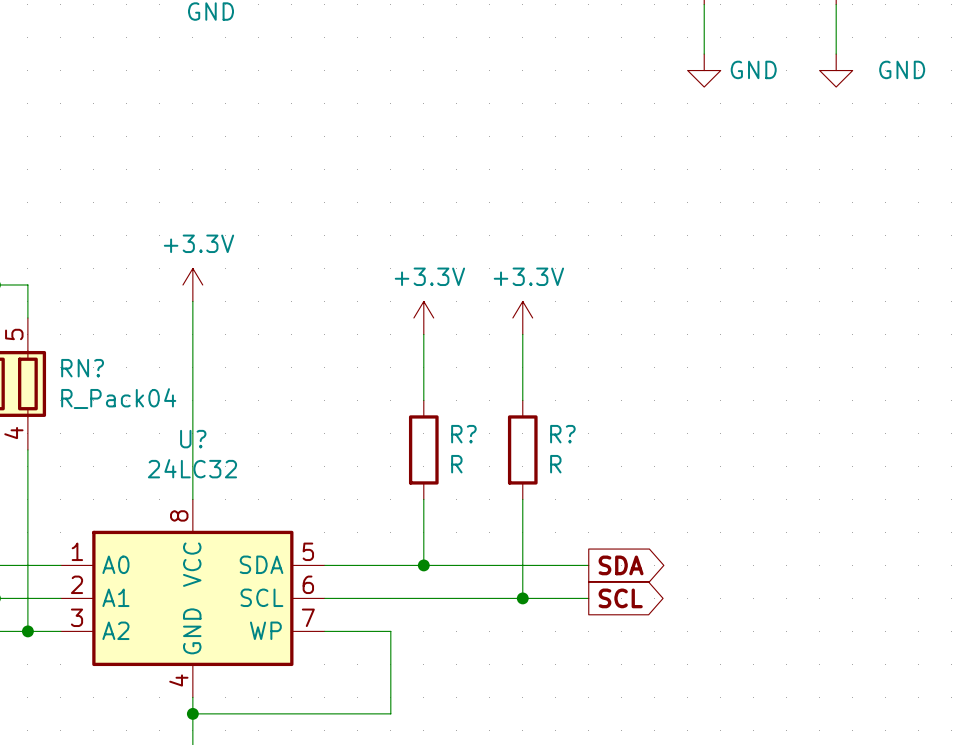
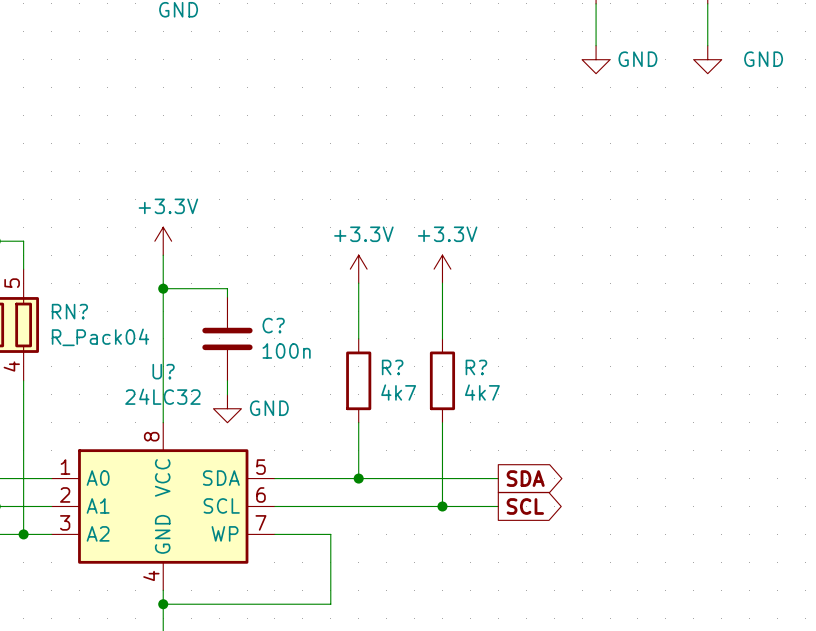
wire: none -> (163, 288) (227, 288) (227, 297)
junction: none -> (163, 288)
C?: none -> 100n (227, 338)
wire: none -> (227, 380) (227, 394)
R? value: R (456, 464) -> 4k7 (398, 392)
R? value: R (555, 464) -> 4k7 (482, 392)
power symbol: none -> GND (227, 408)

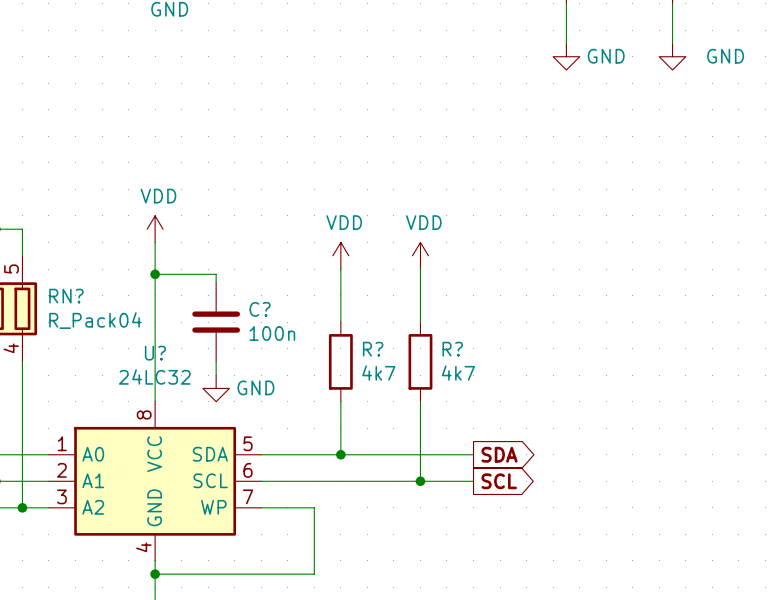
power symbol: +3.3V (163, 241) -> VDD (155, 229)
power symbol: +3.3V (358, 269) -> VDD (340, 255)
power symbol: +3.3V (442, 269) -> VDD (420, 255)

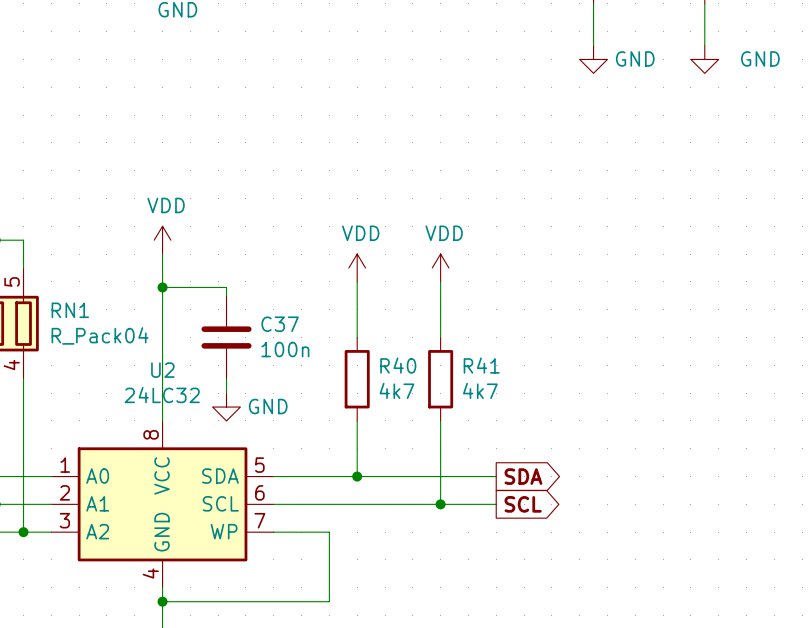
RN? name: RN? (66, 296) -> RN1 (70, 310)
C? name: C? (260, 309) -> C37 (280, 324)
R? name: R? (373, 349) -> R40 (398, 365)
R? name: R? (452, 349) -> R41 (481, 365)
U? name: U? (155, 353) -> U2 (162, 370)

